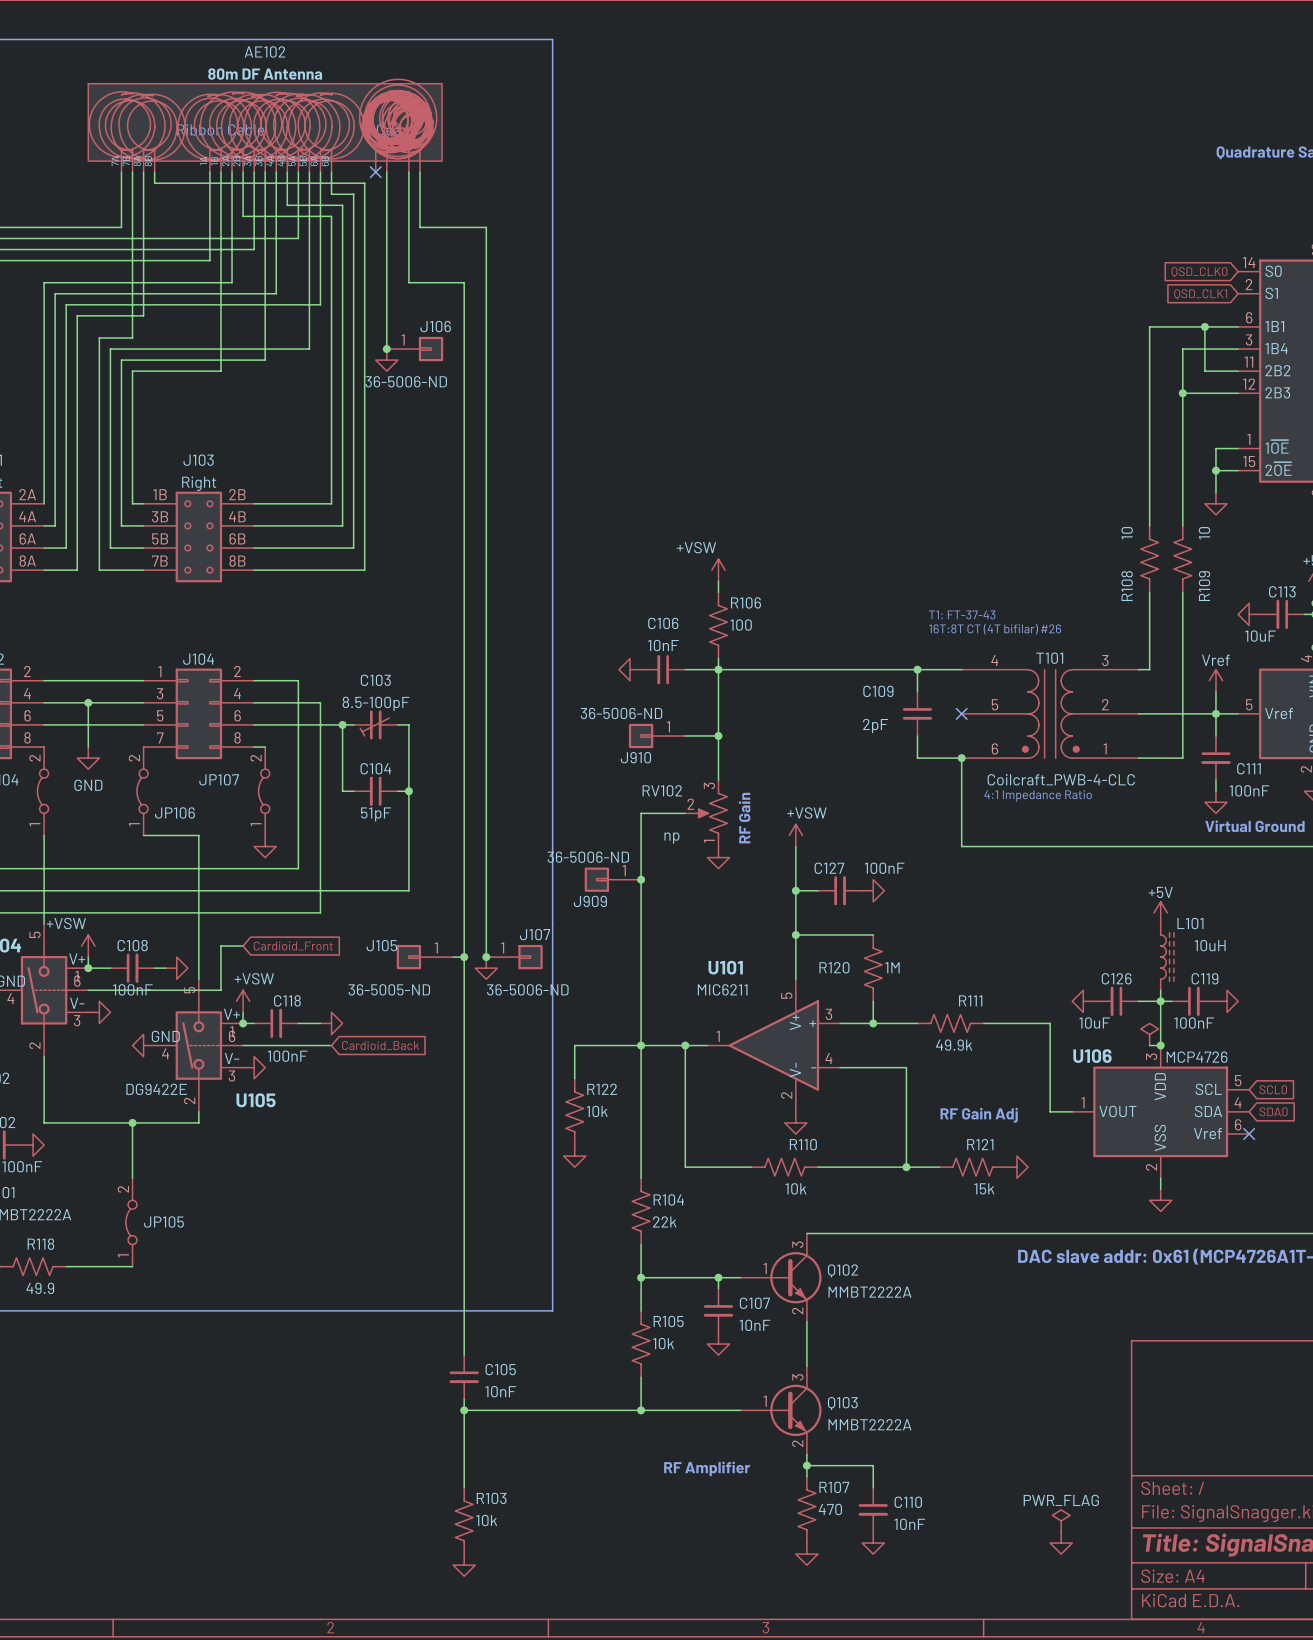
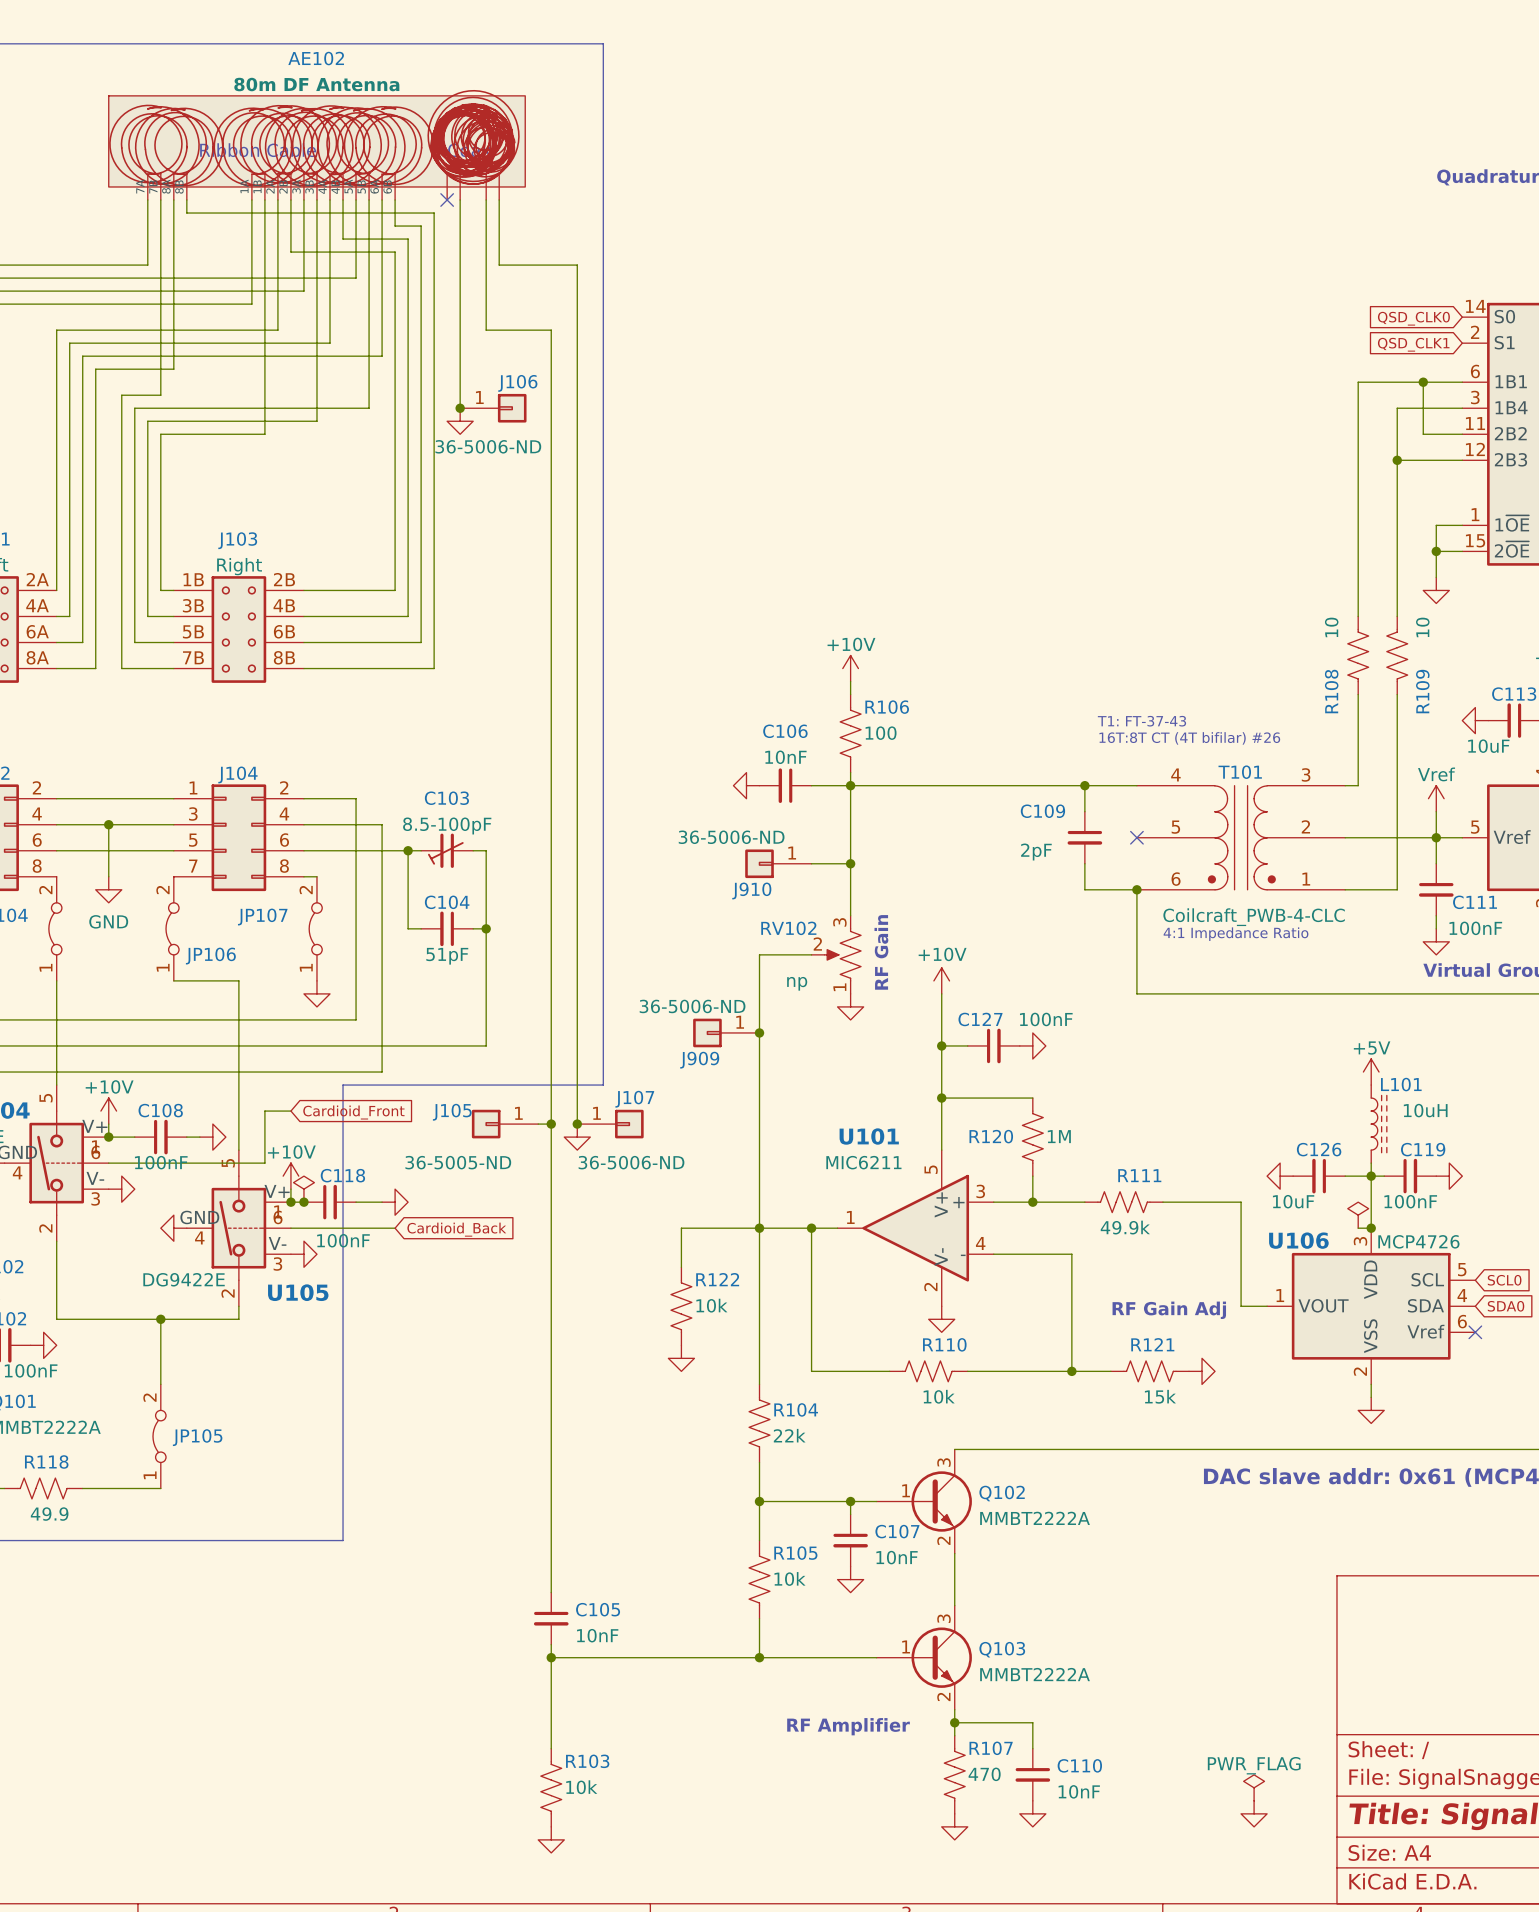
line: (508, 39) (552, 39) (552, 1310) (287, 1310) -> (603, 43) (603, 1085) (343, 1085) (343, 1540)
power symbol: +VSW (718, 570) -> +10V (850, 668)
power symbol: +VSW (795, 835) -> +10V (941, 980)
power symbol: +VSW (88, 946) -> +10V (108, 1111)
power symbol: +VSW (243, 1001) -> +10V (290, 1176)
power symbol: none -> (303, 1189)
junction: none -> (303, 1202)

